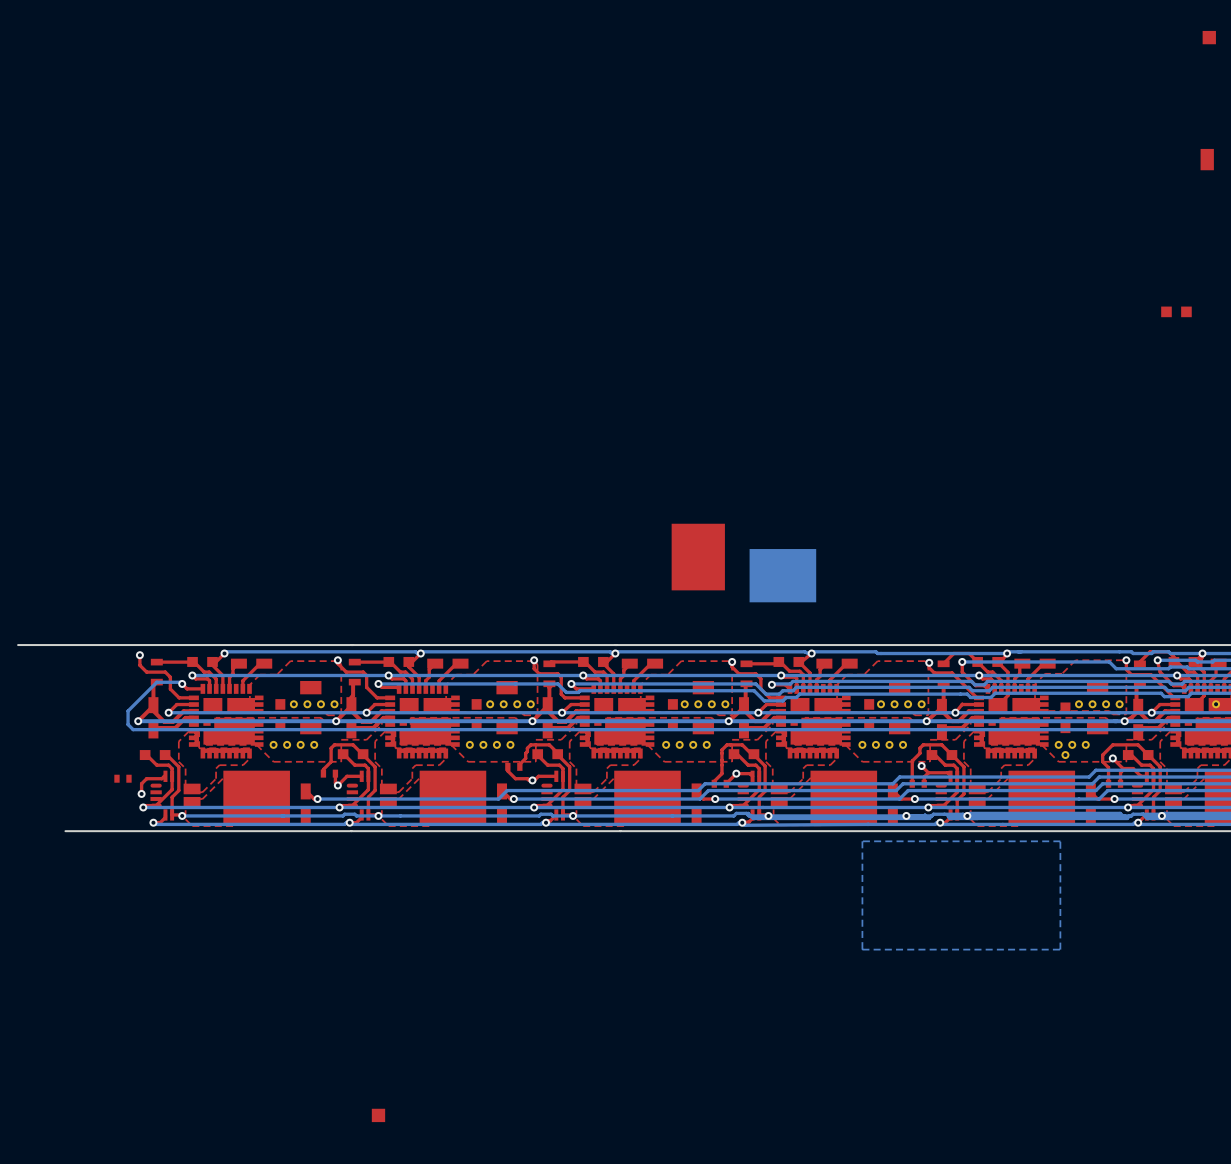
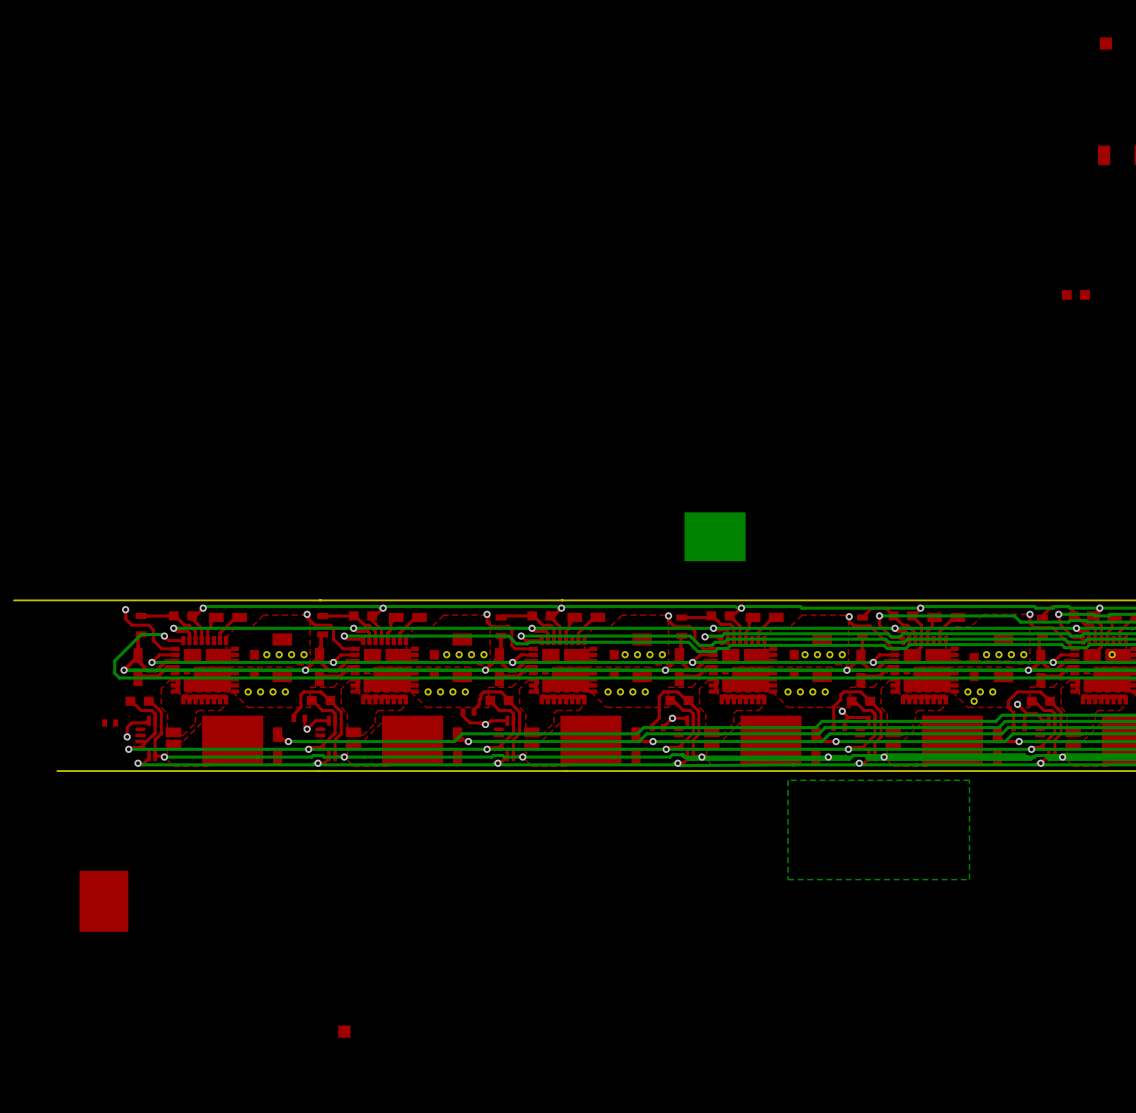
part: (698, 557) -> none
part: none -> (103, 901)

